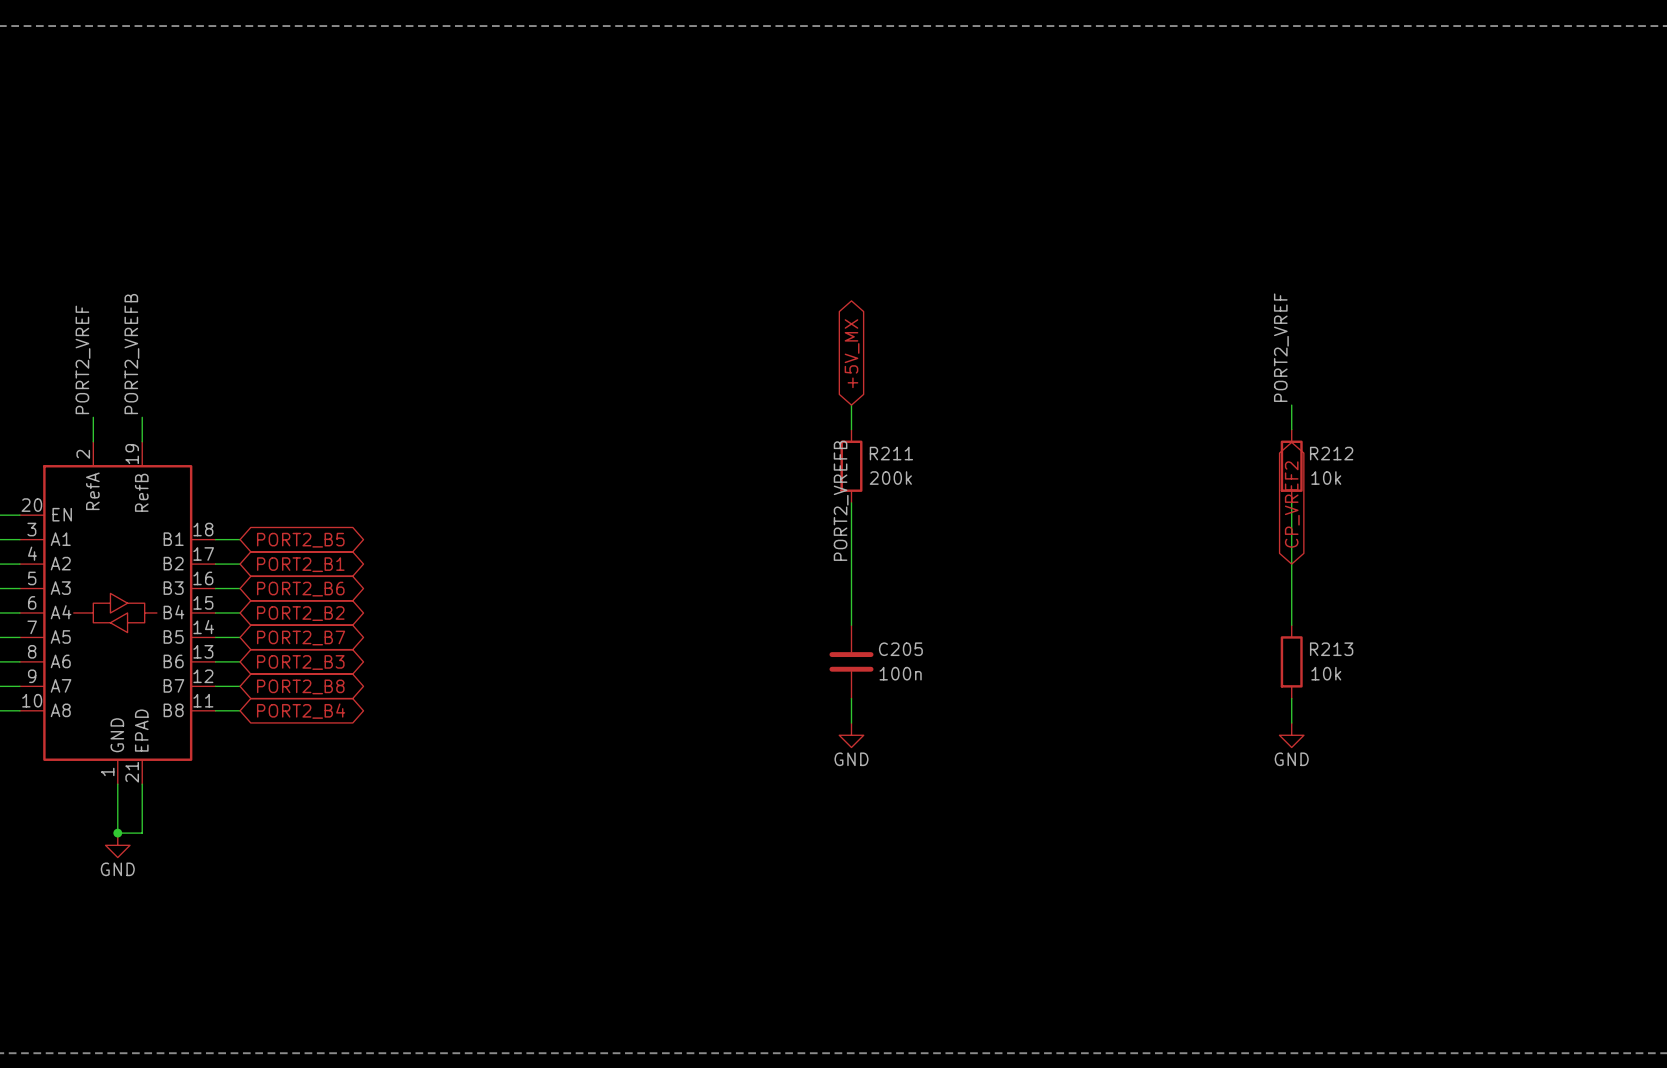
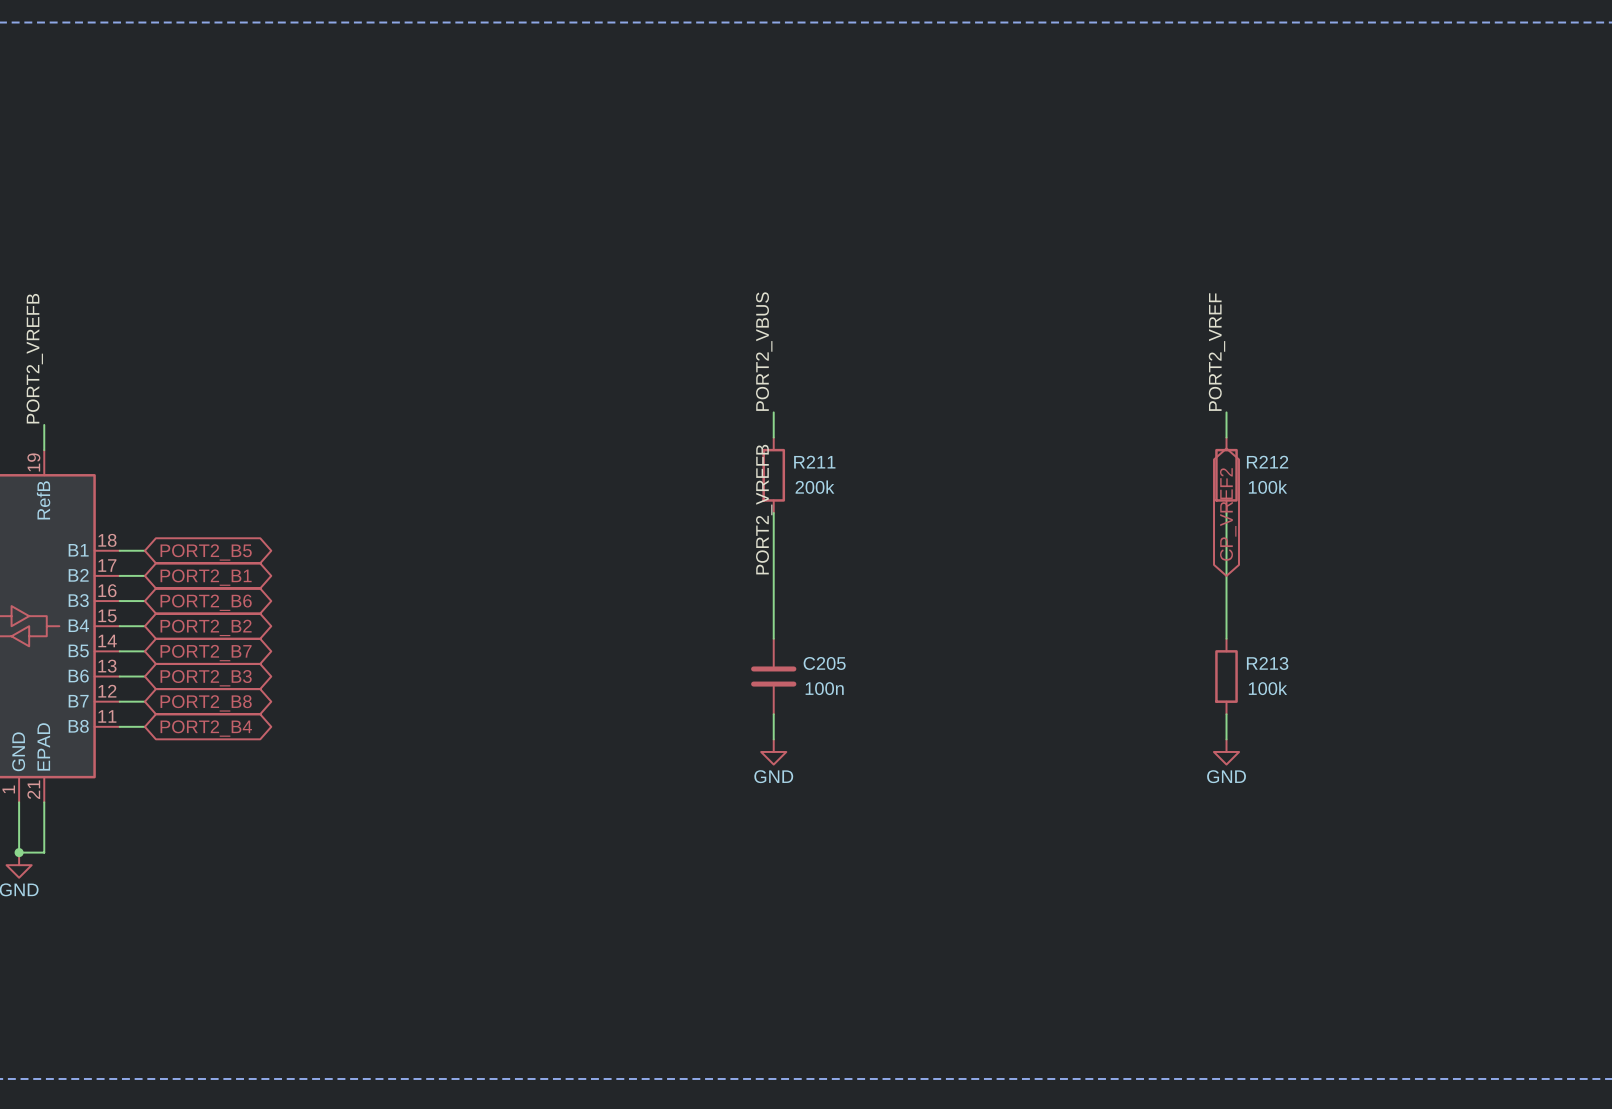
label: none -> PORT2_VBUS (764, 351)
global label: +5V_MX (852, 353) -> none
R212 value: 10k (1326, 478) -> 100k (1267, 487)
R213 value: 10k (1326, 673) -> 100k (1267, 688)

